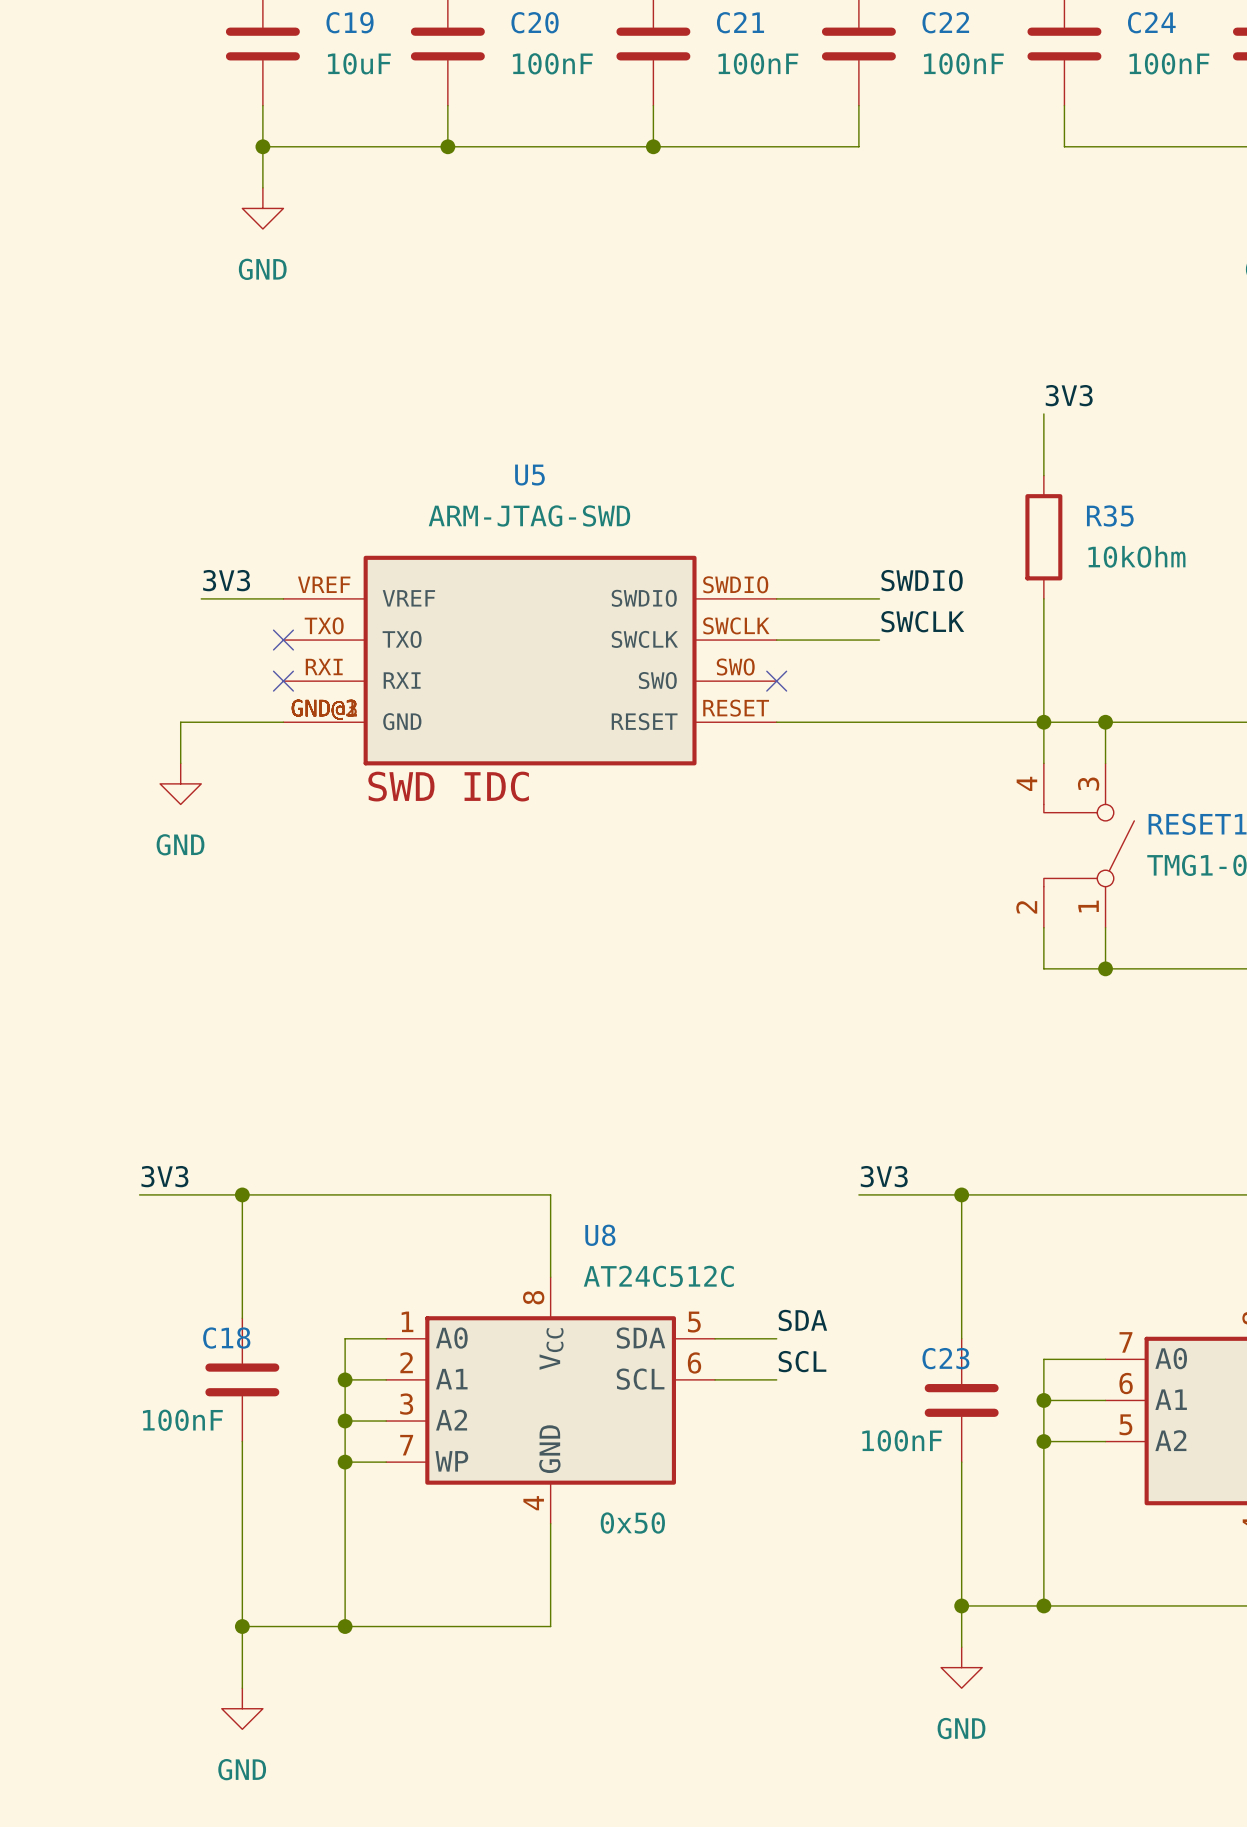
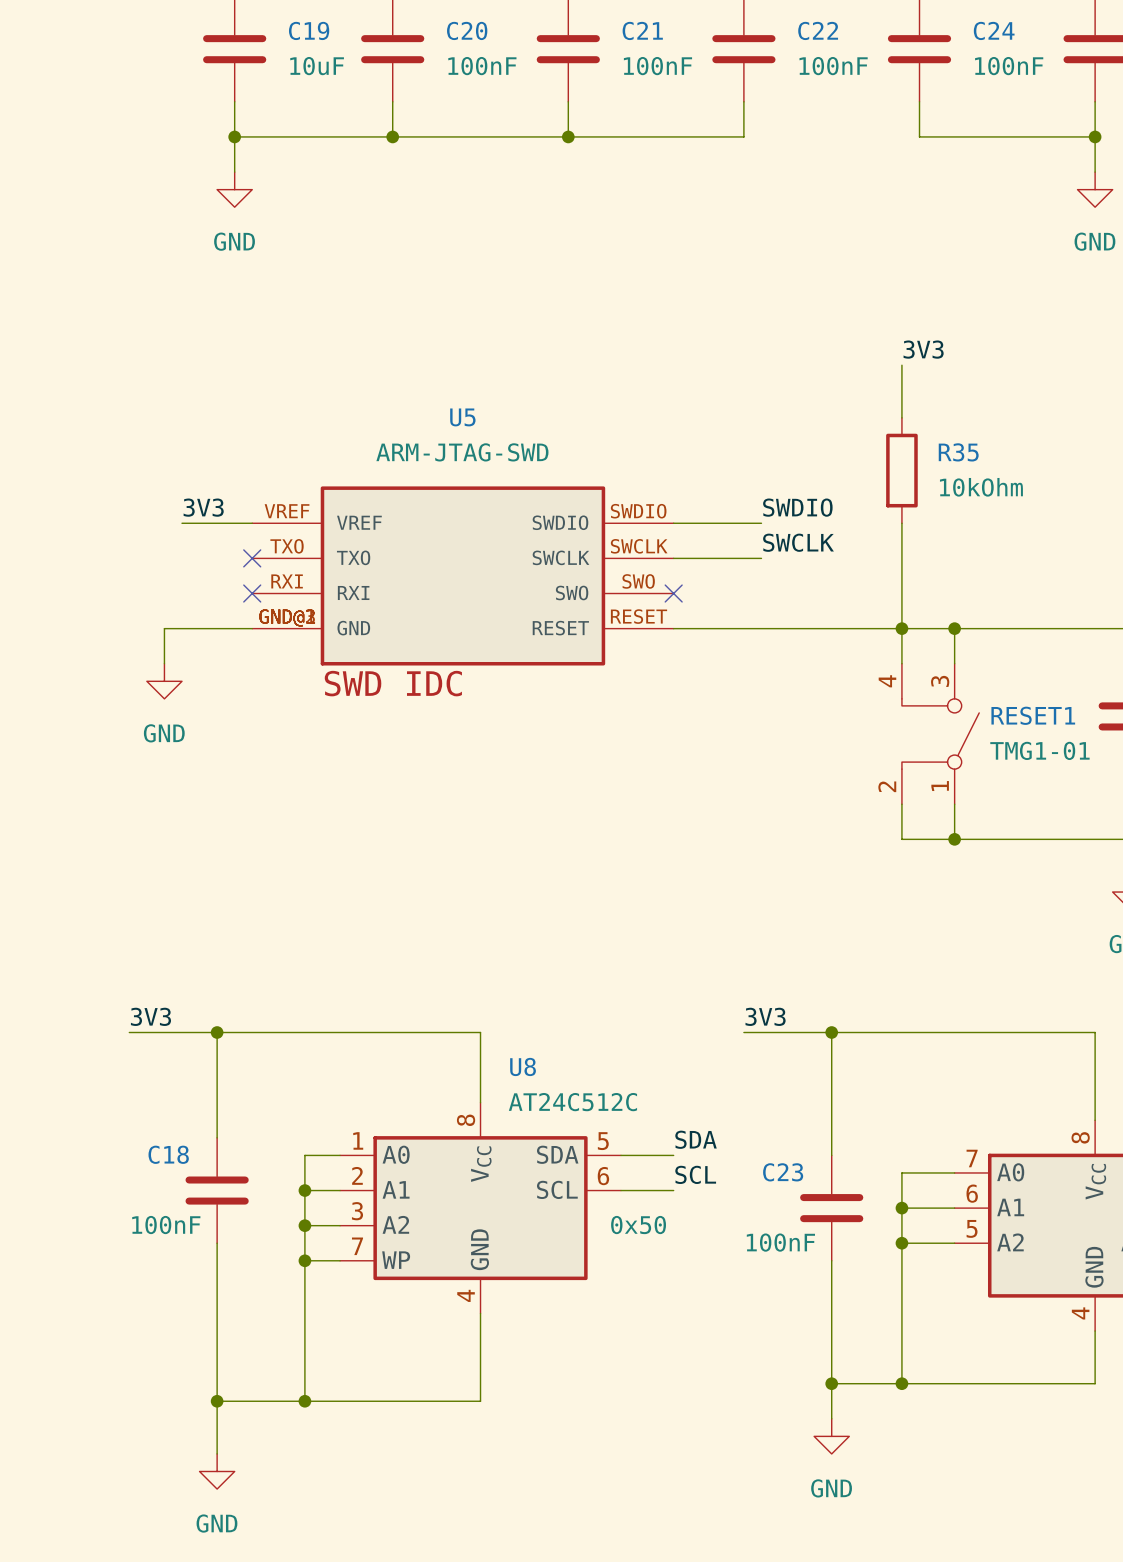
C18 name position: C18 (226, 1338) -> C18 (168, 1154)
C23 name position: C23 (945, 1358) -> C23 (783, 1172)
U8 text position: 0x50 (632, 1523) -> 0x50 (638, 1225)

